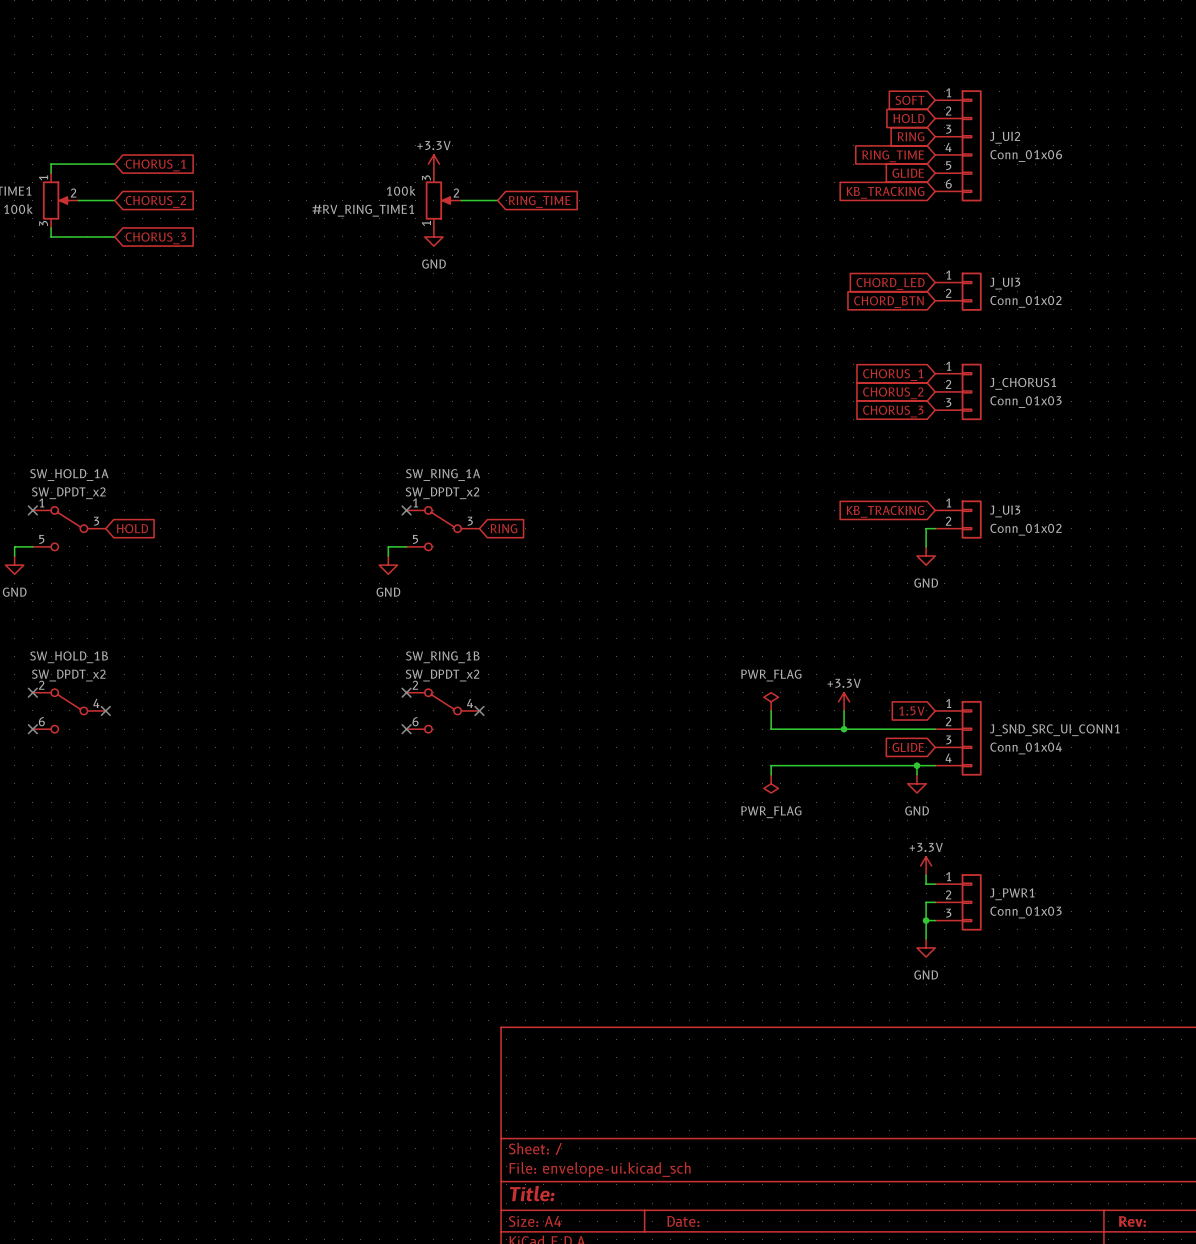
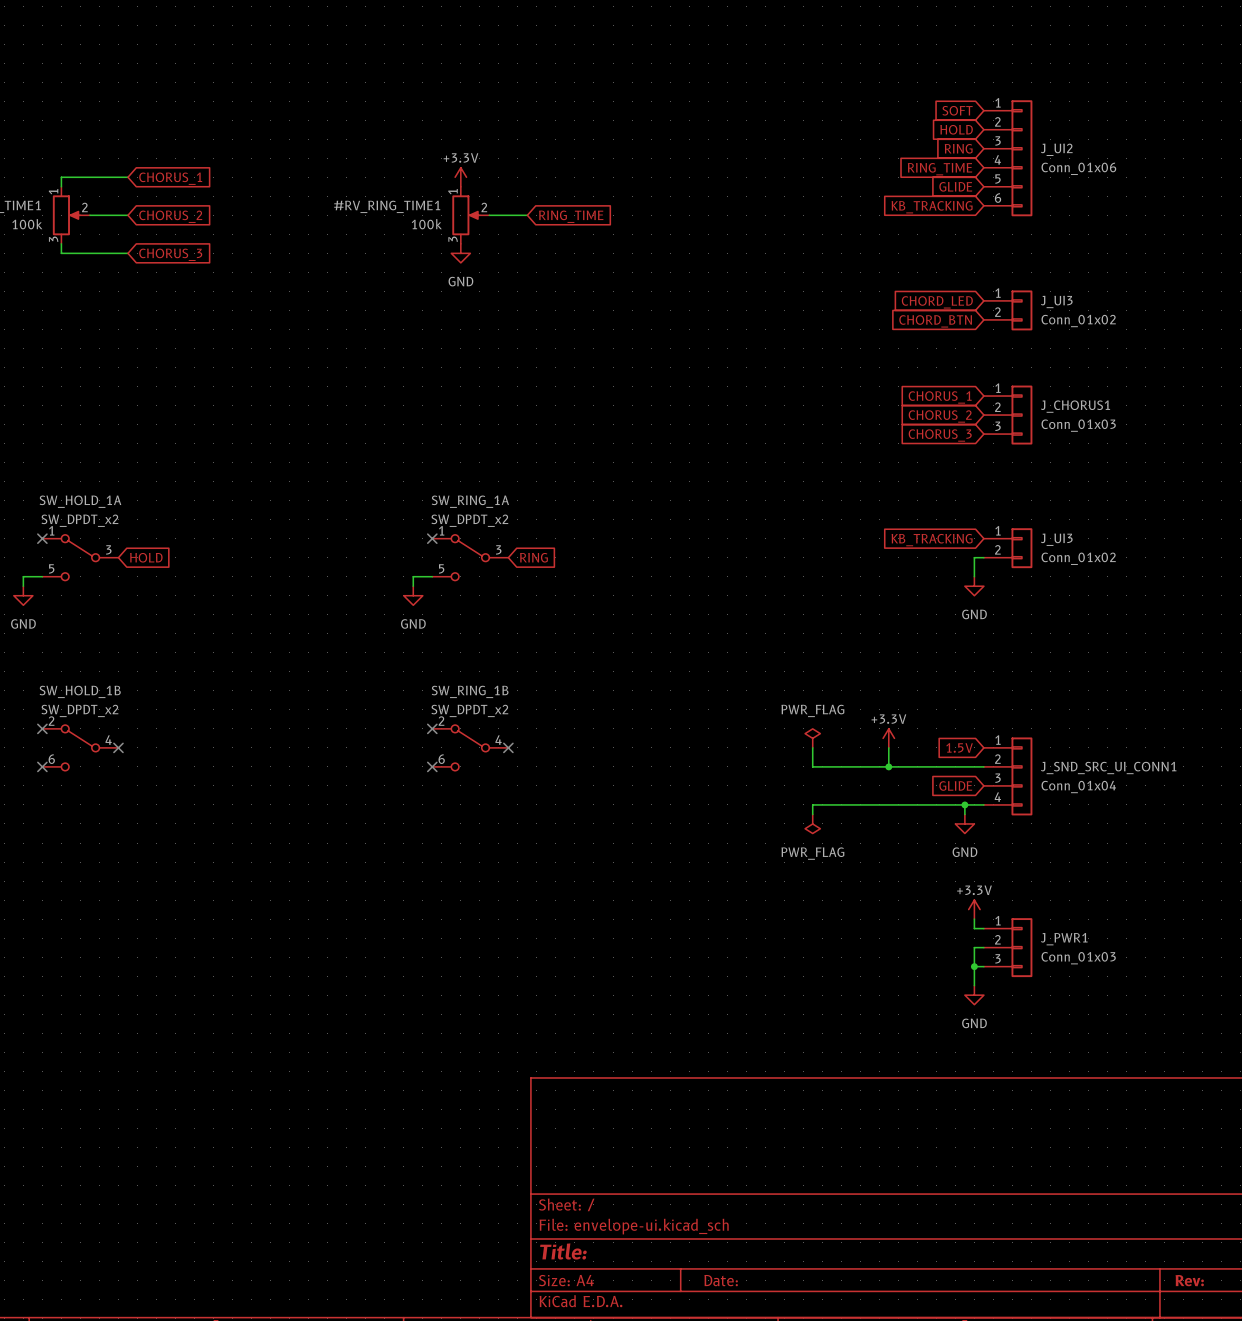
#RV_RING_TIME1 flip: as is (438, 200) -> up-down (466, 215)

